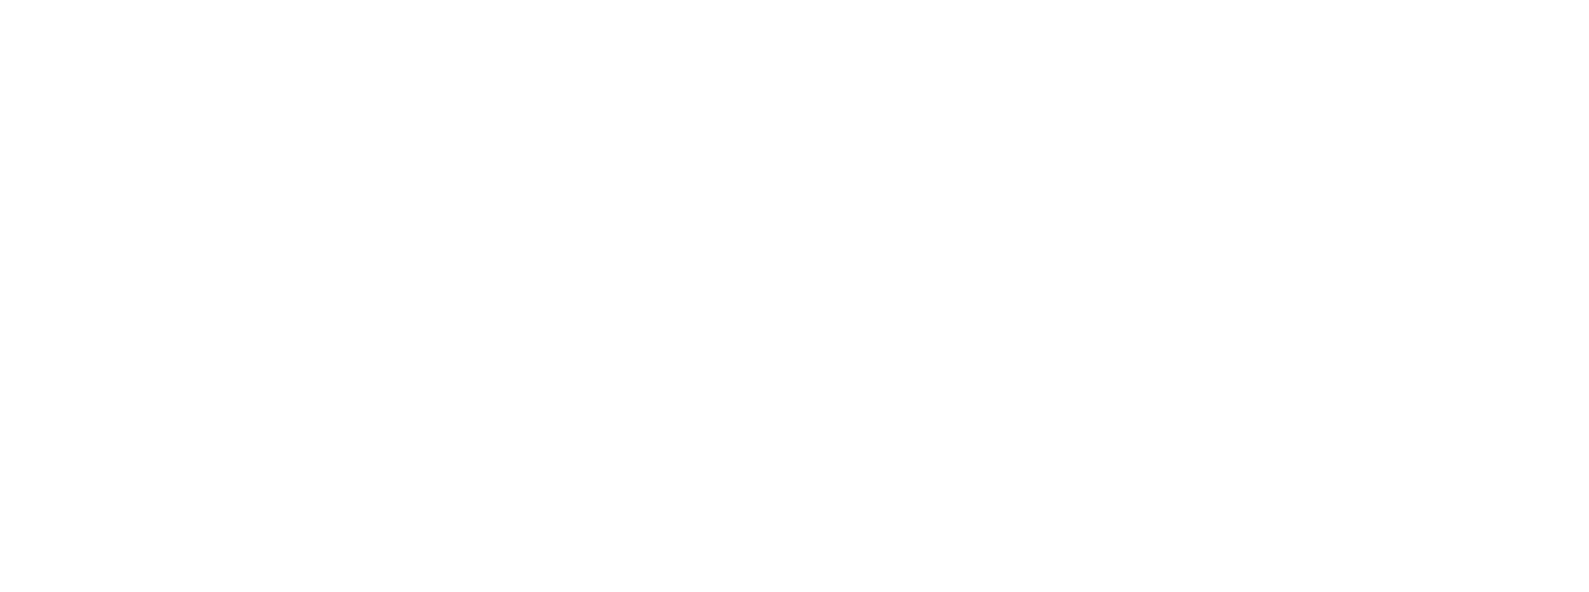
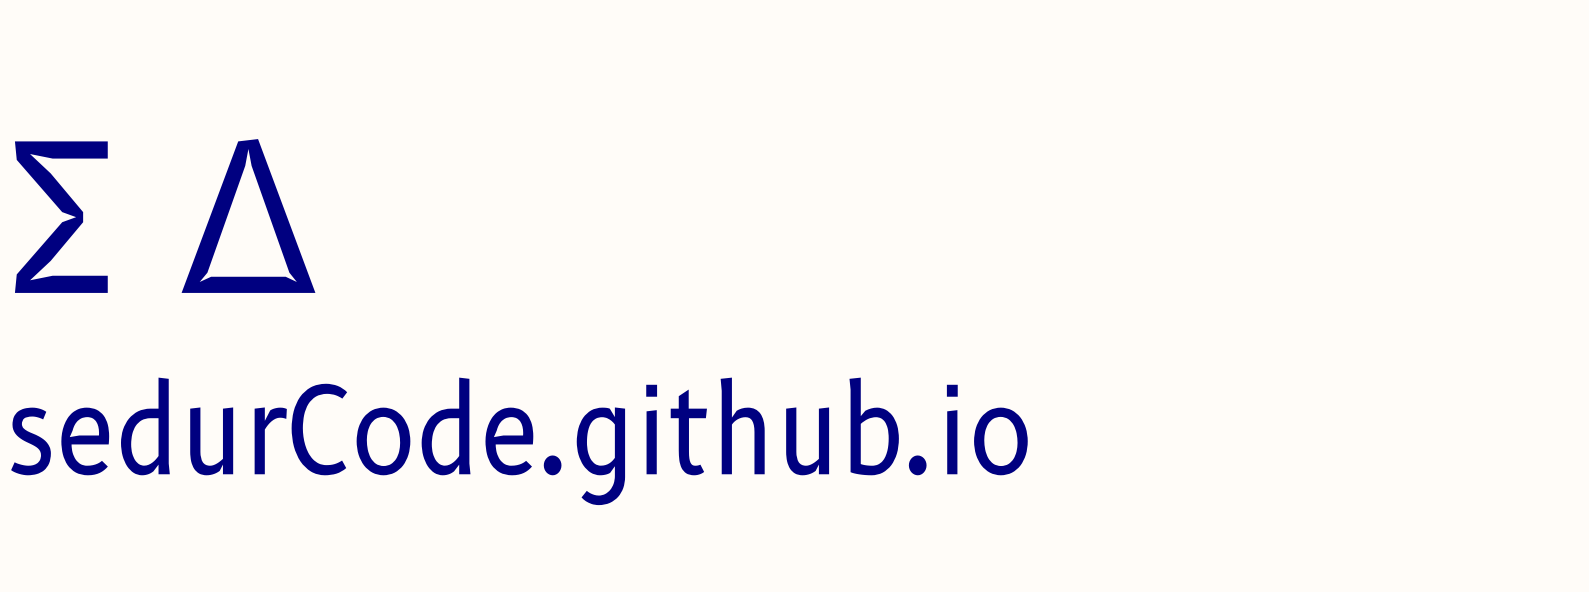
text: none -> Σ Δ (165, 215)
text: none -> sedurCode.github.io (519, 441)

